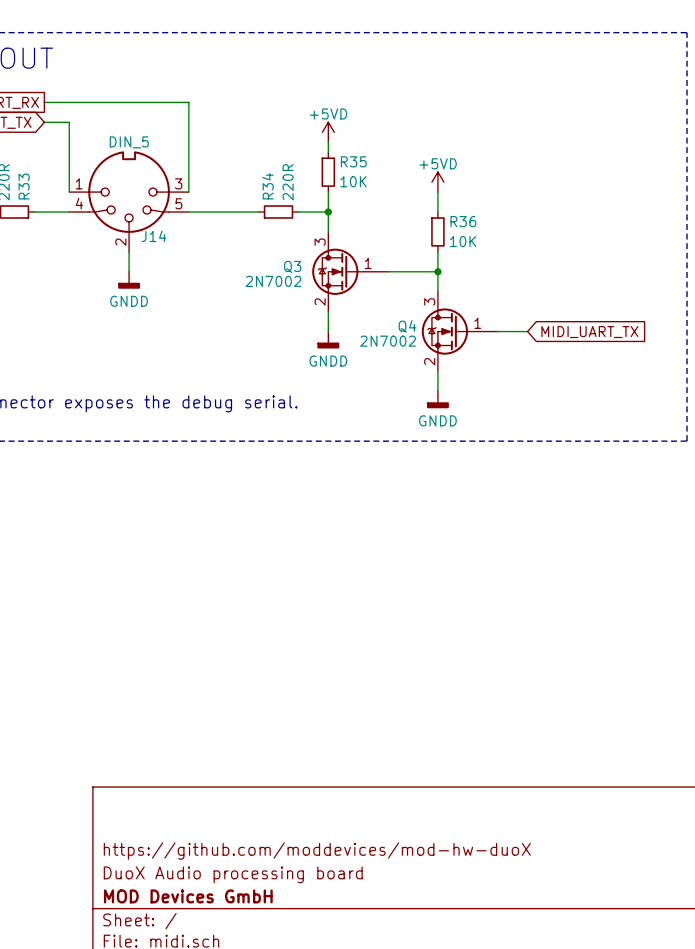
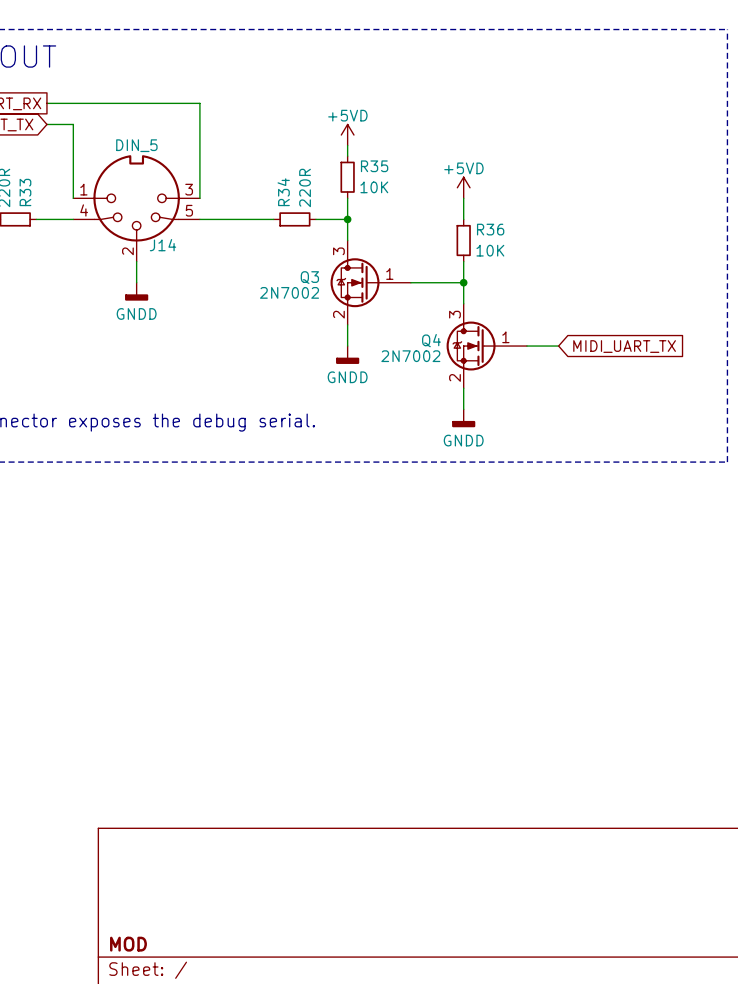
title block: https://github.com/moddevices/mod-hw-duoX (317, 851) -> none
title block: DuoX Audio processing board (233, 874) -> none
title block: MOD Devices GmbH (188, 896) -> MOD (128, 944)

